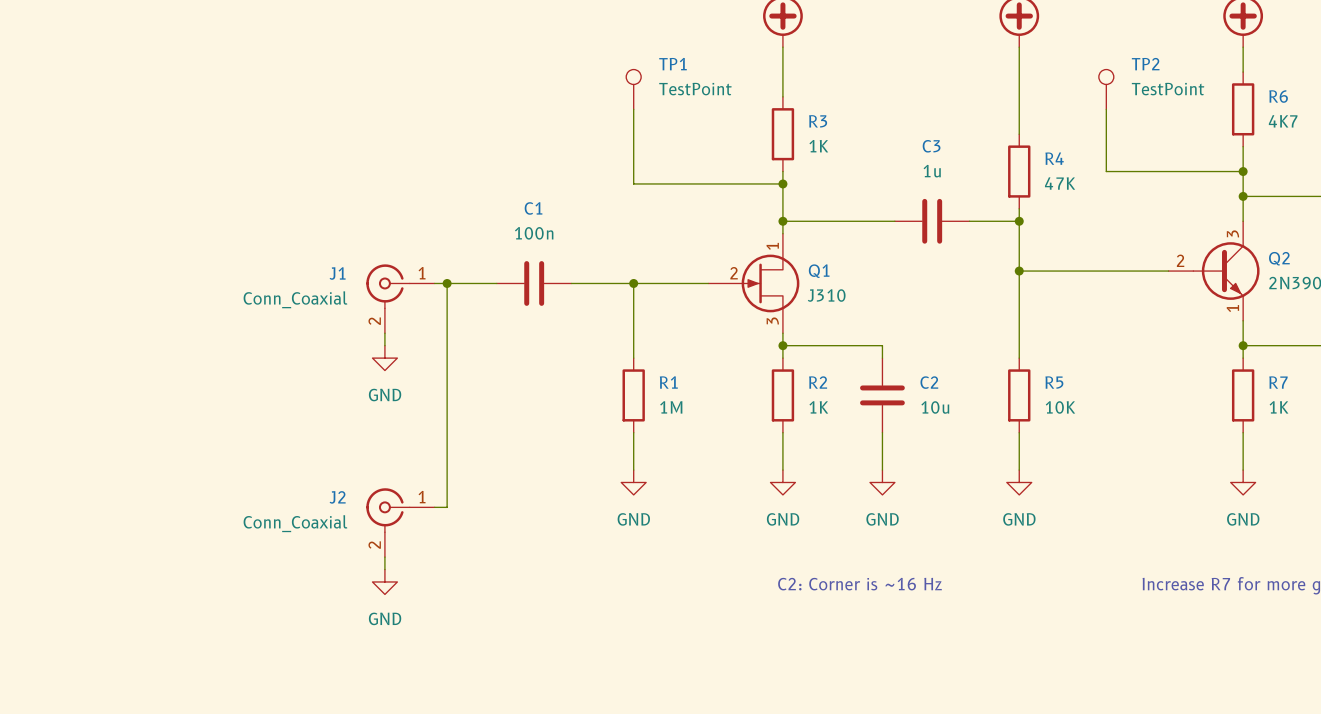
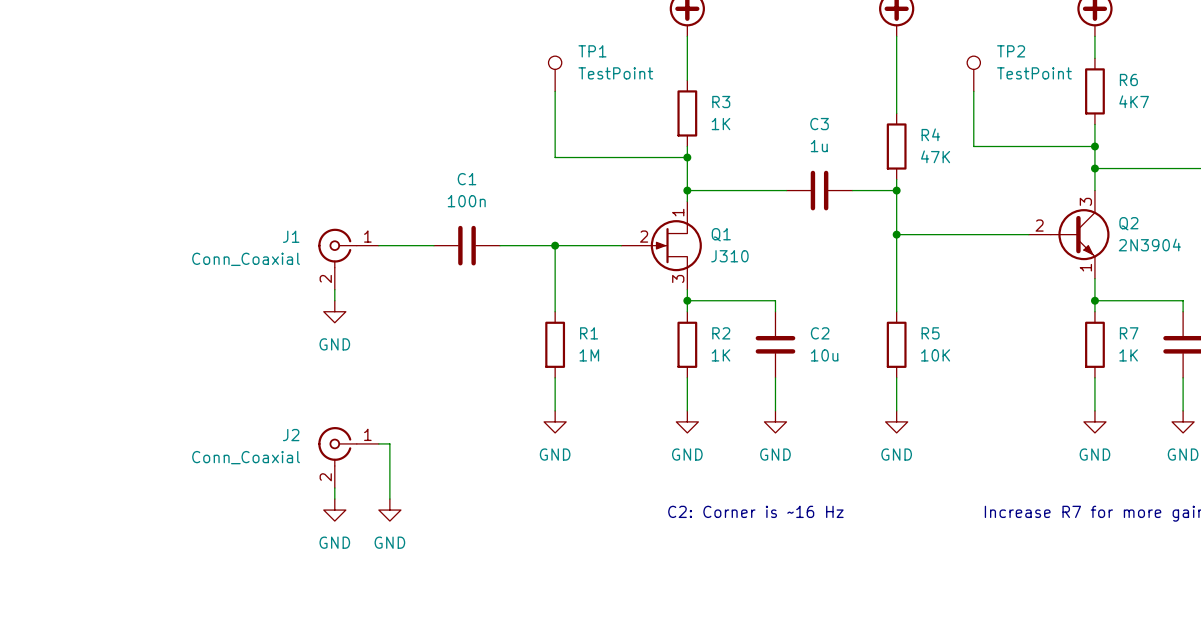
wire: (447, 283) (447, 507) -> (389, 499) (389, 443)
junction: (447, 283) -> none
power symbol: none -> GND (389, 510)

